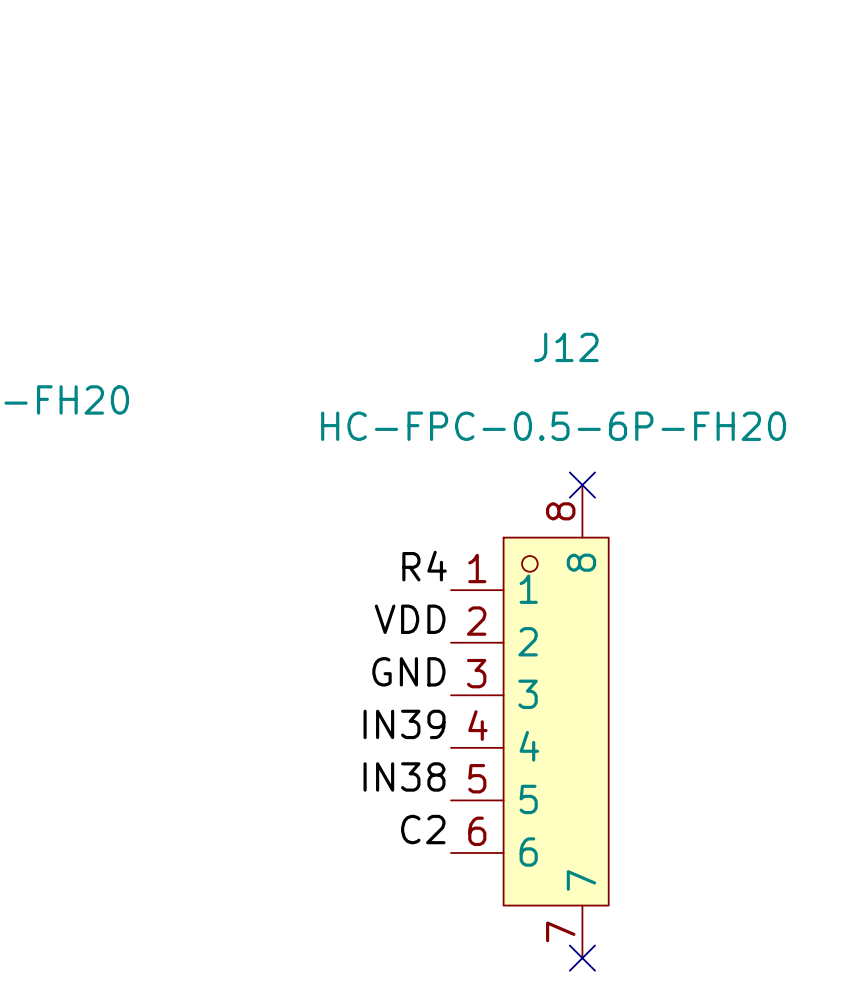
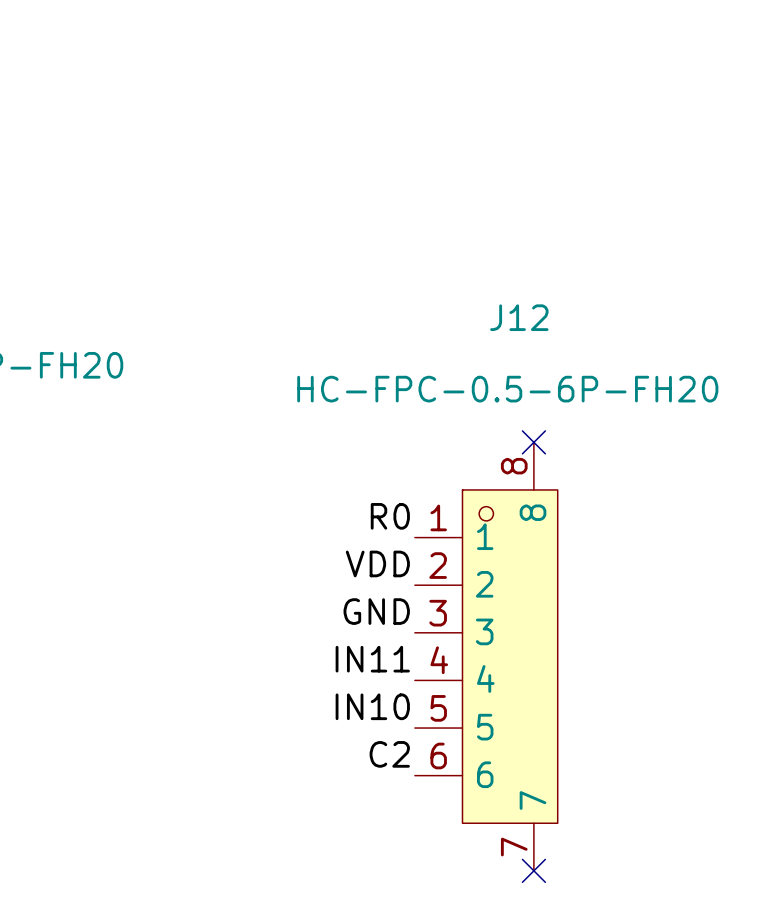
label: R4 (424, 566) -> R0 (390, 516)
label: IN39 (404, 724) -> IN11 (372, 659)
label: IN38 (404, 776) -> IN10 (372, 706)

